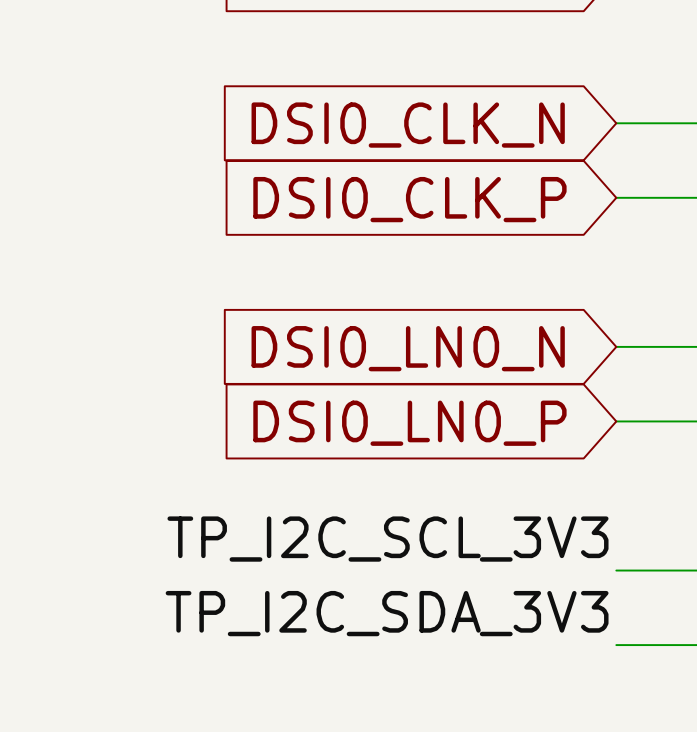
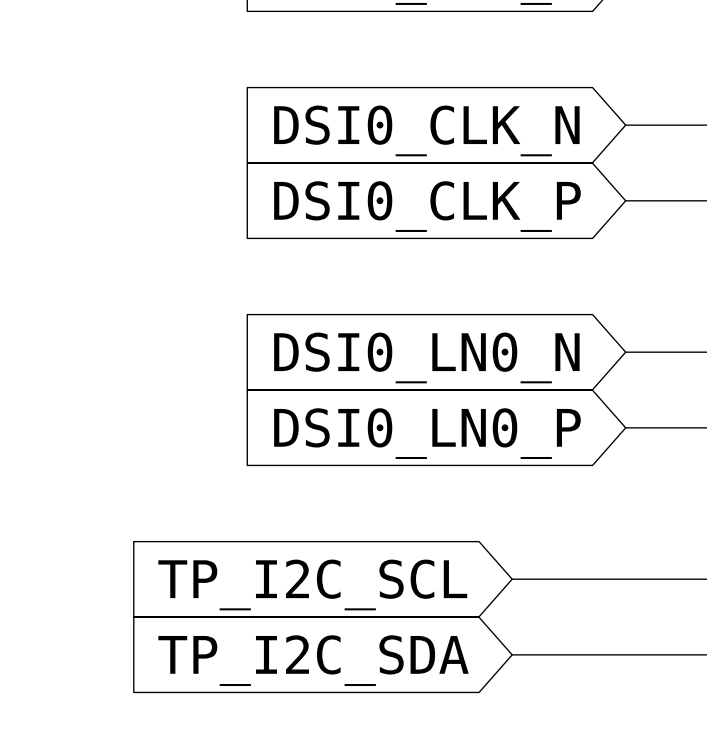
label: TP_I2C_SCL_3V3 (387, 539) -> none
wire: none -> (512, 579) (625, 579)
global label: none -> TP_I2C_SCL (312, 584)
label: TP_I2C_SDA_3V3 (387, 613) -> none
wire: none -> (512, 654) (625, 654)
global label: none -> TP_I2C_SDA (313, 660)

